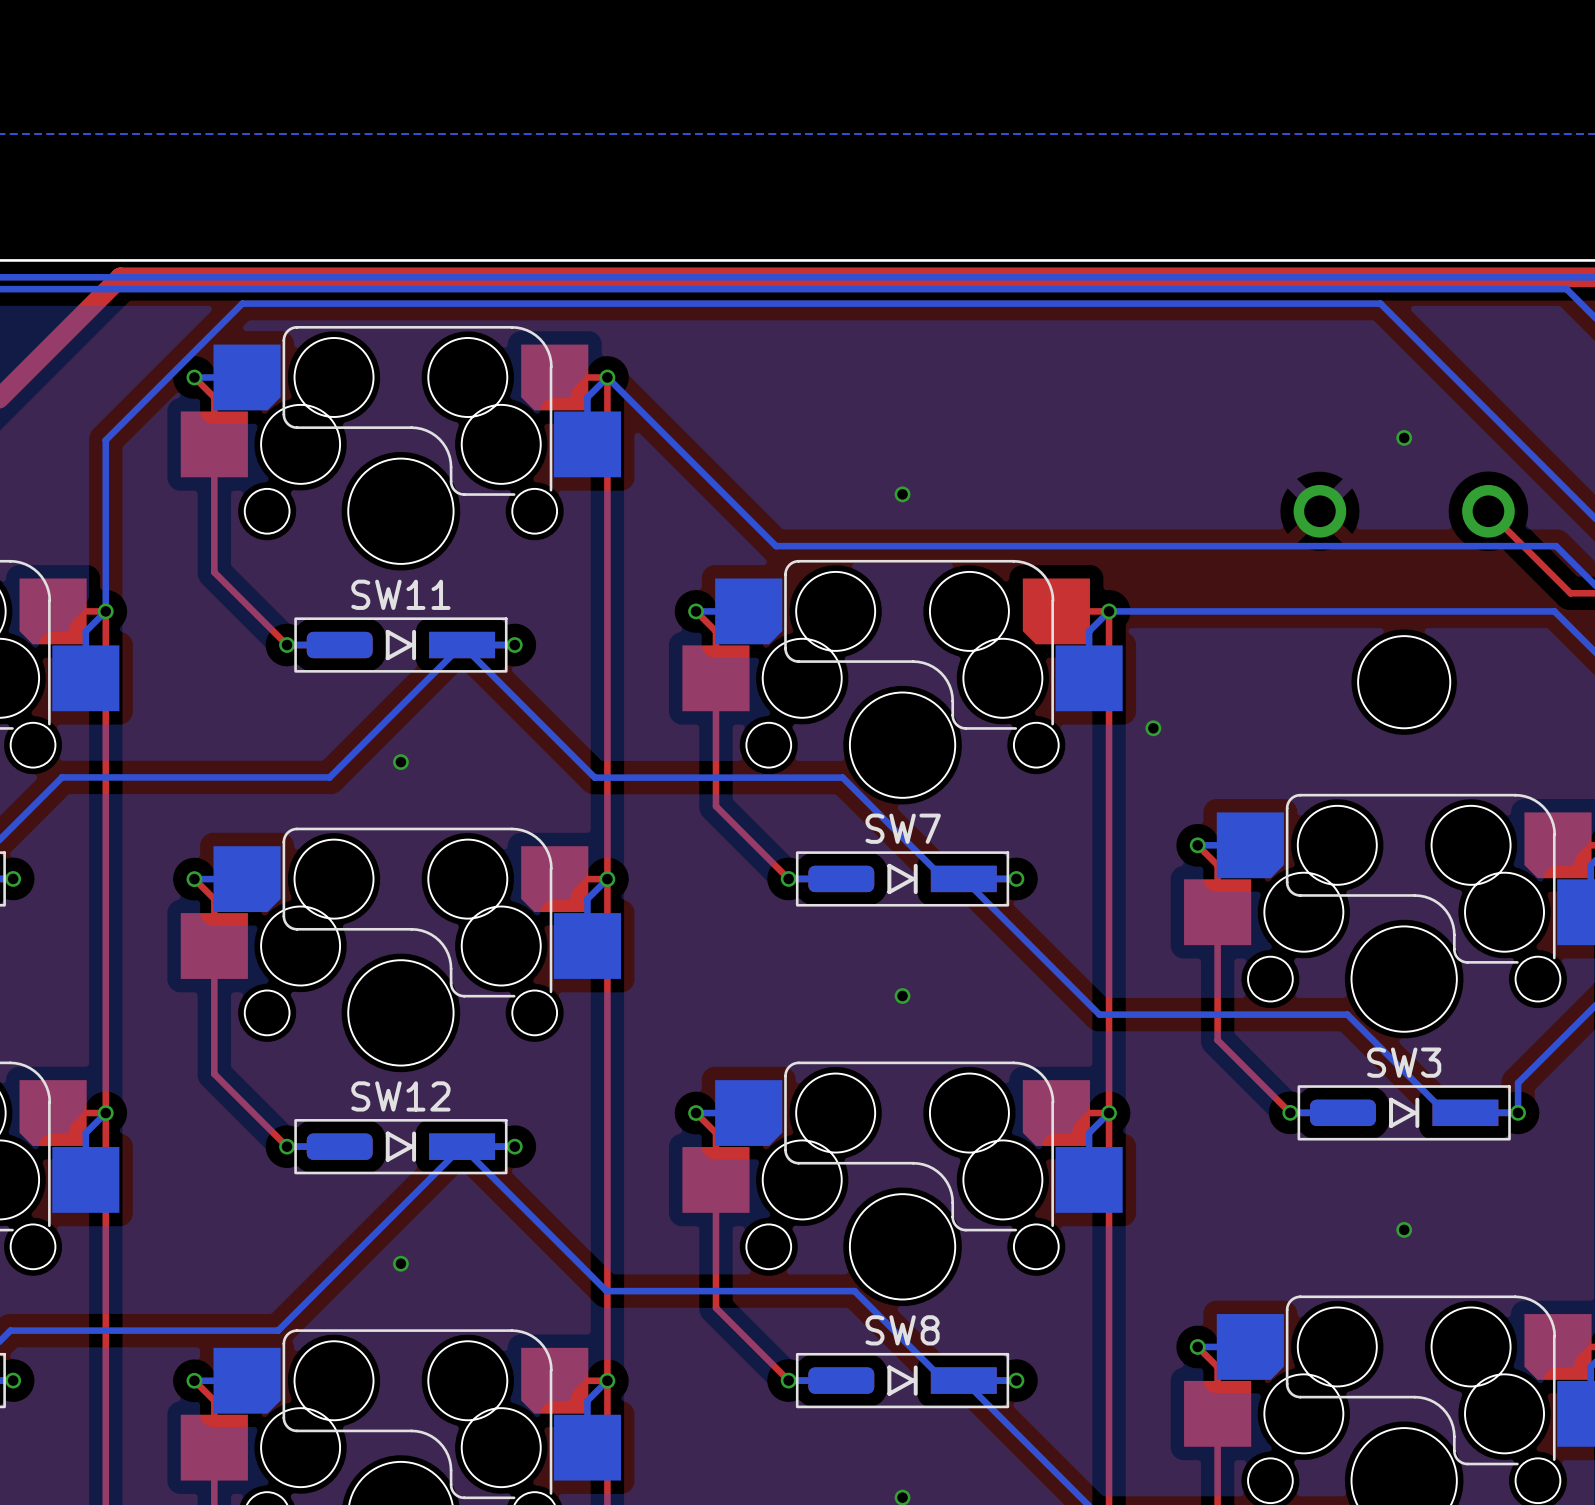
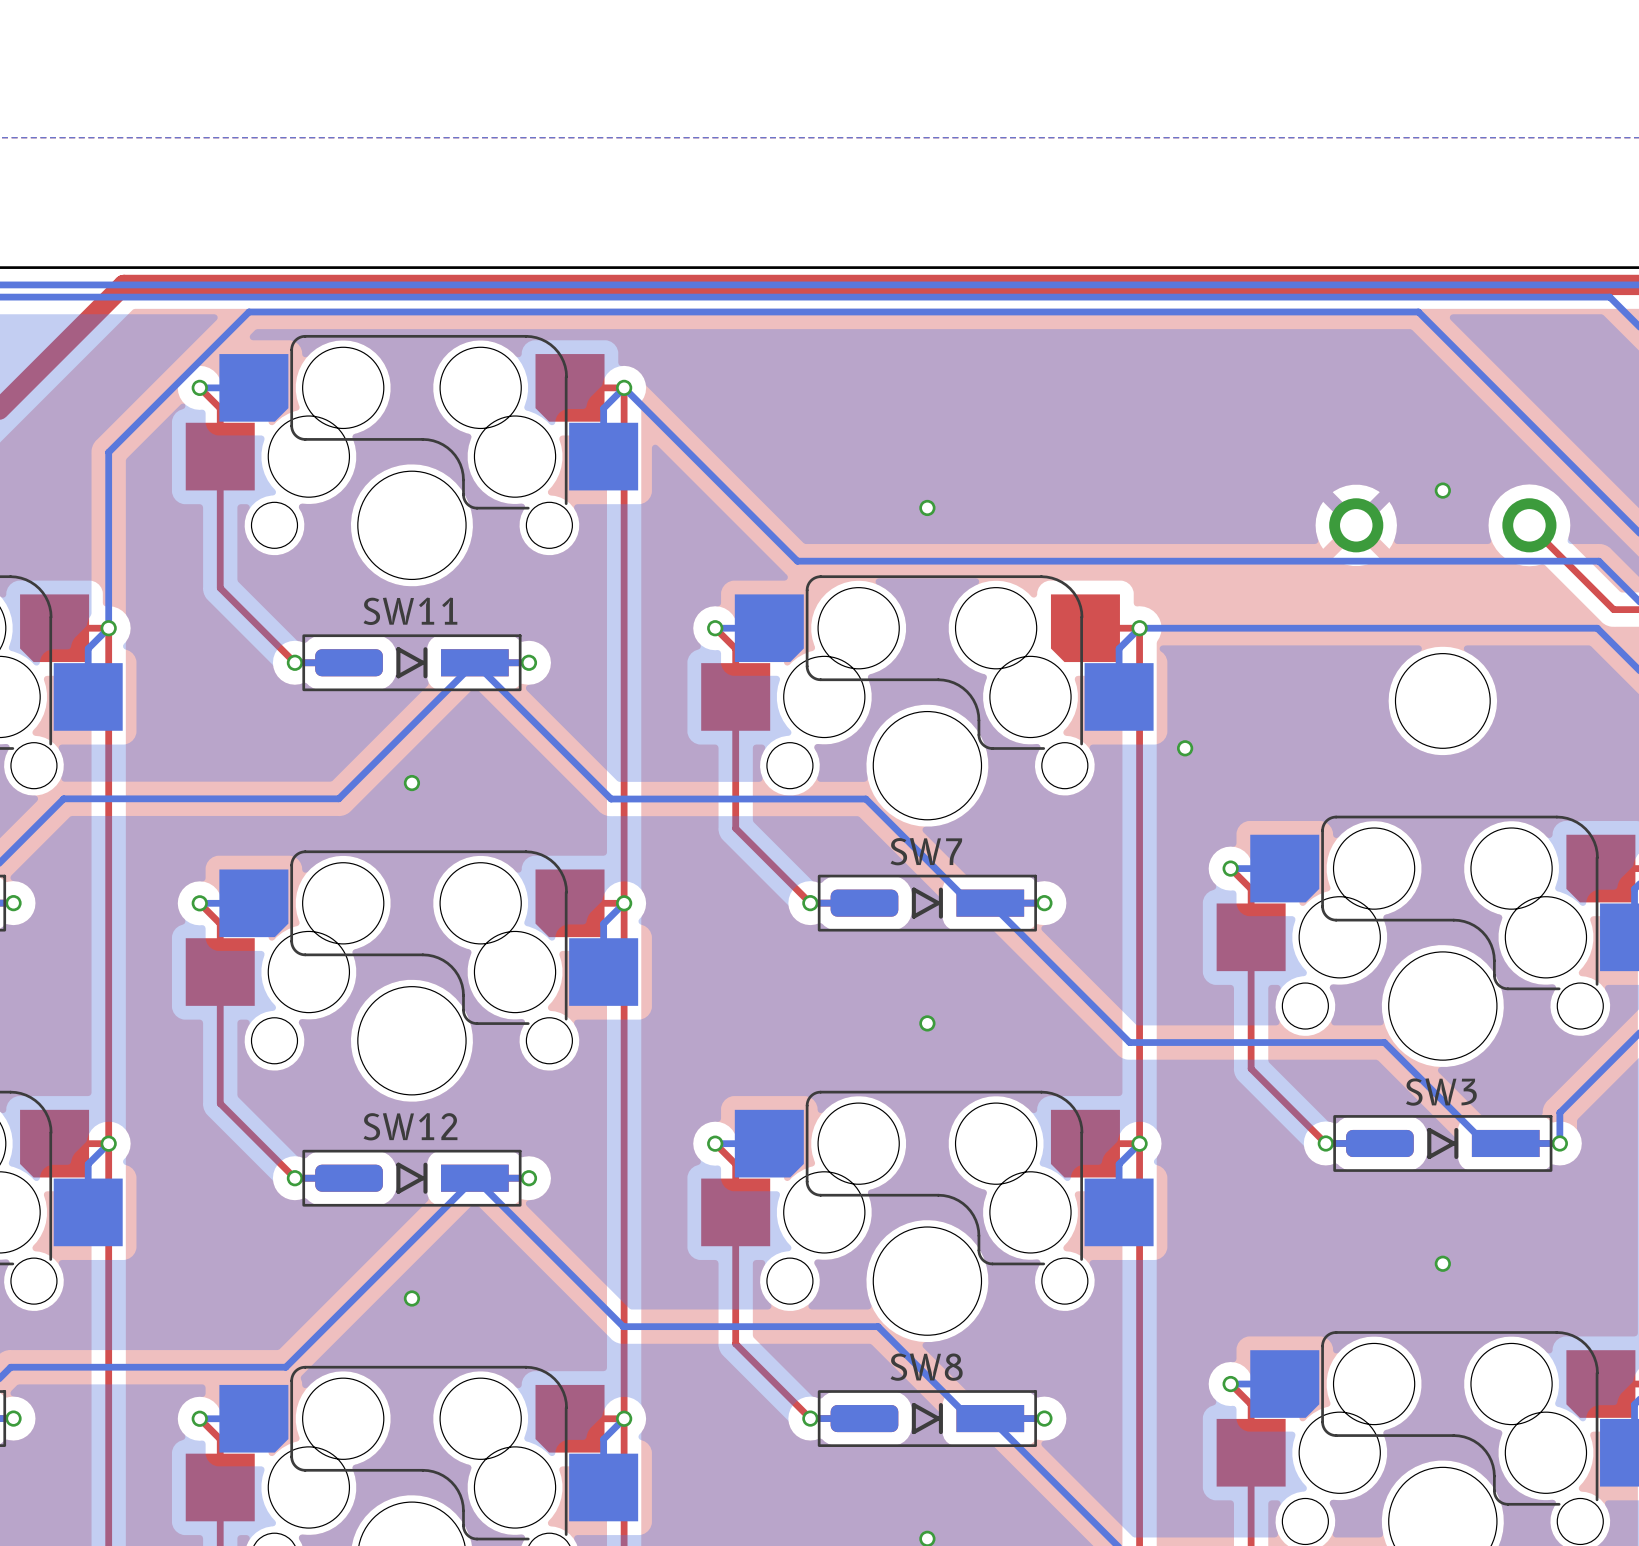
via position: (1404, 437) -> (1442, 490)

